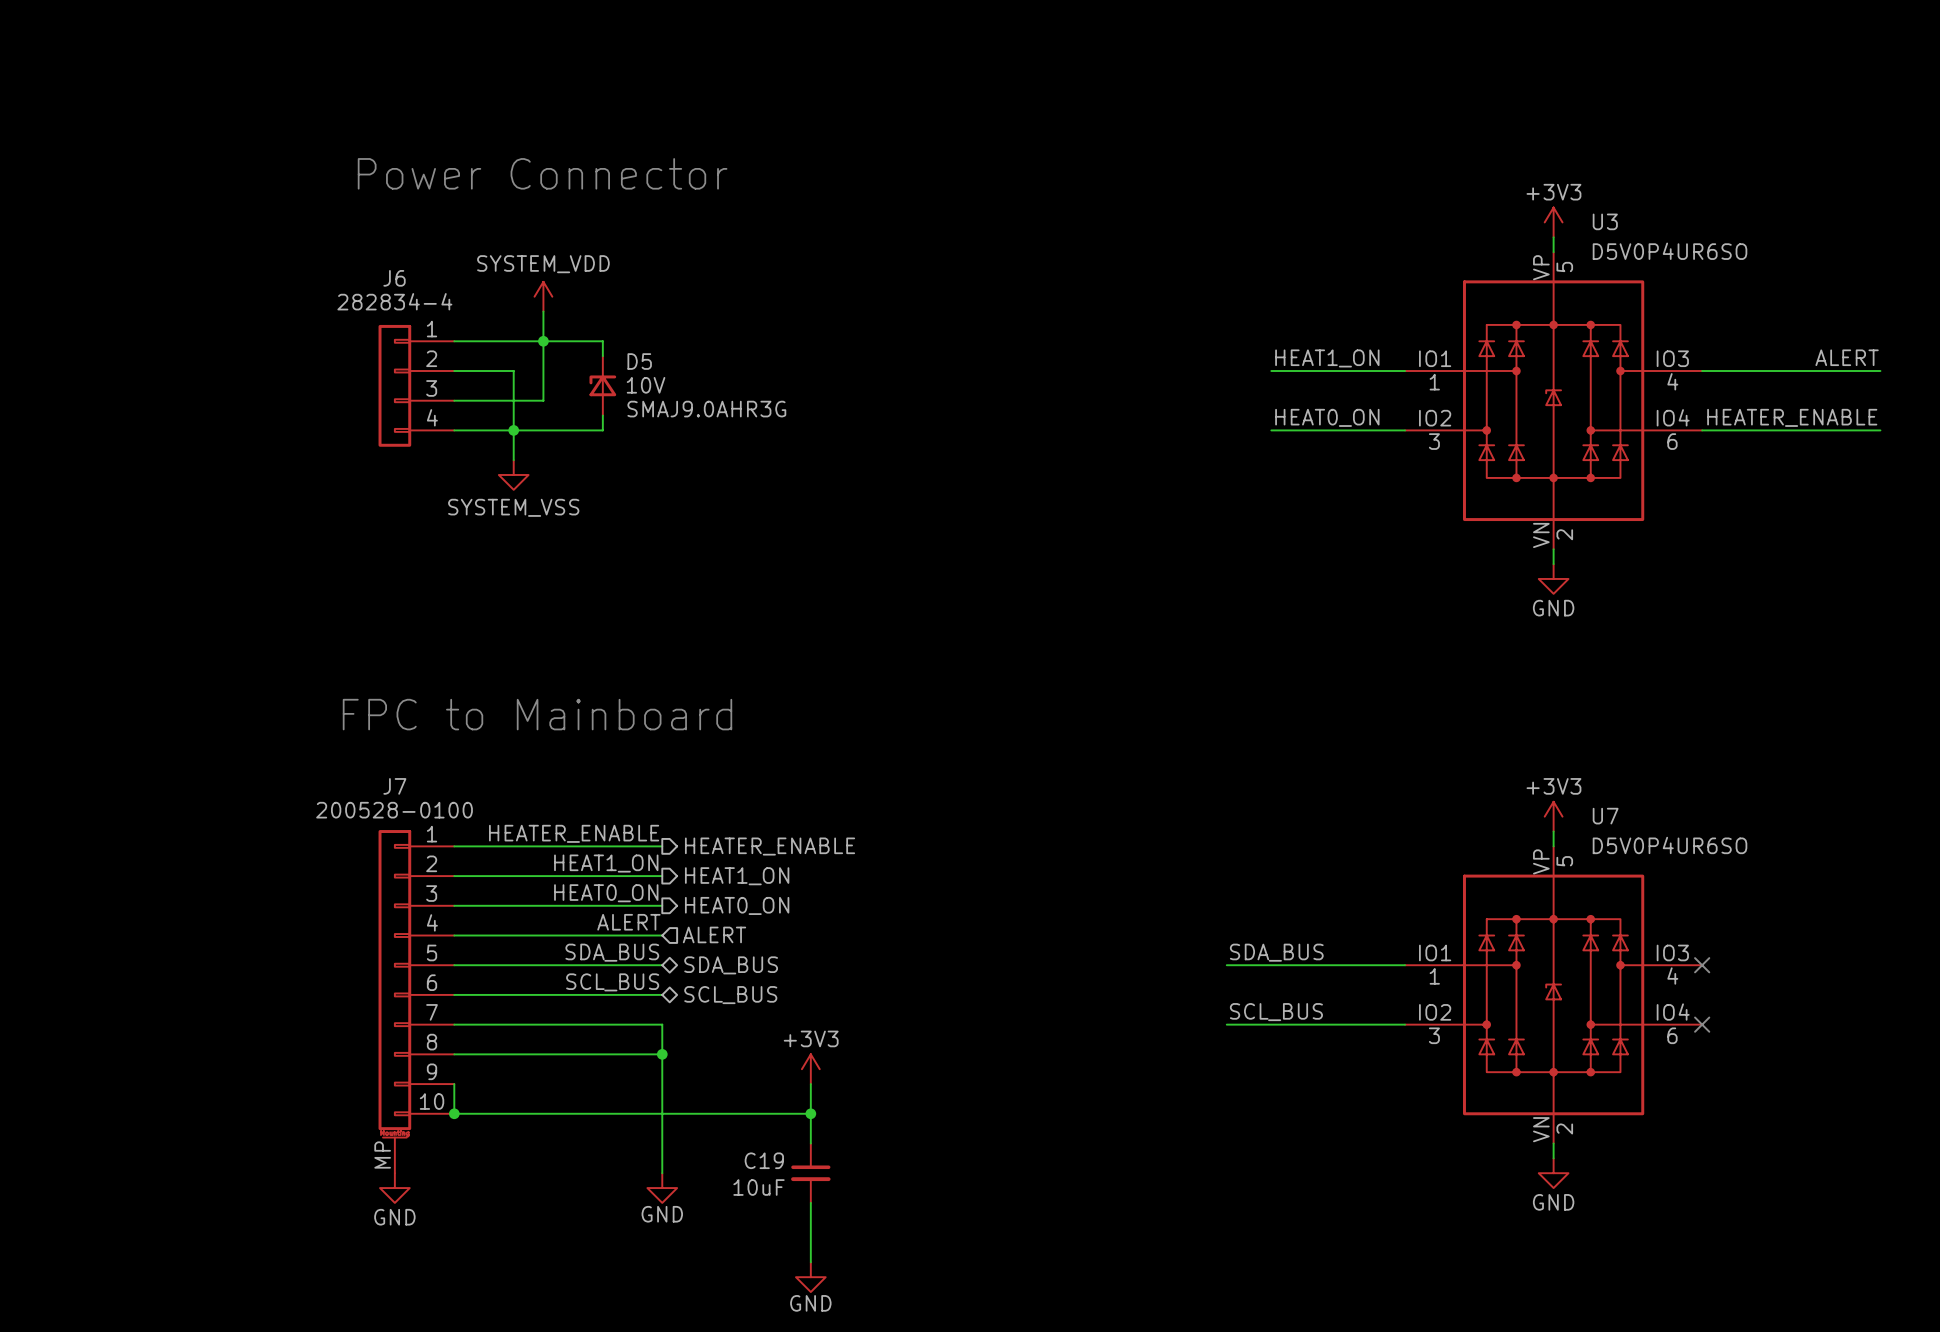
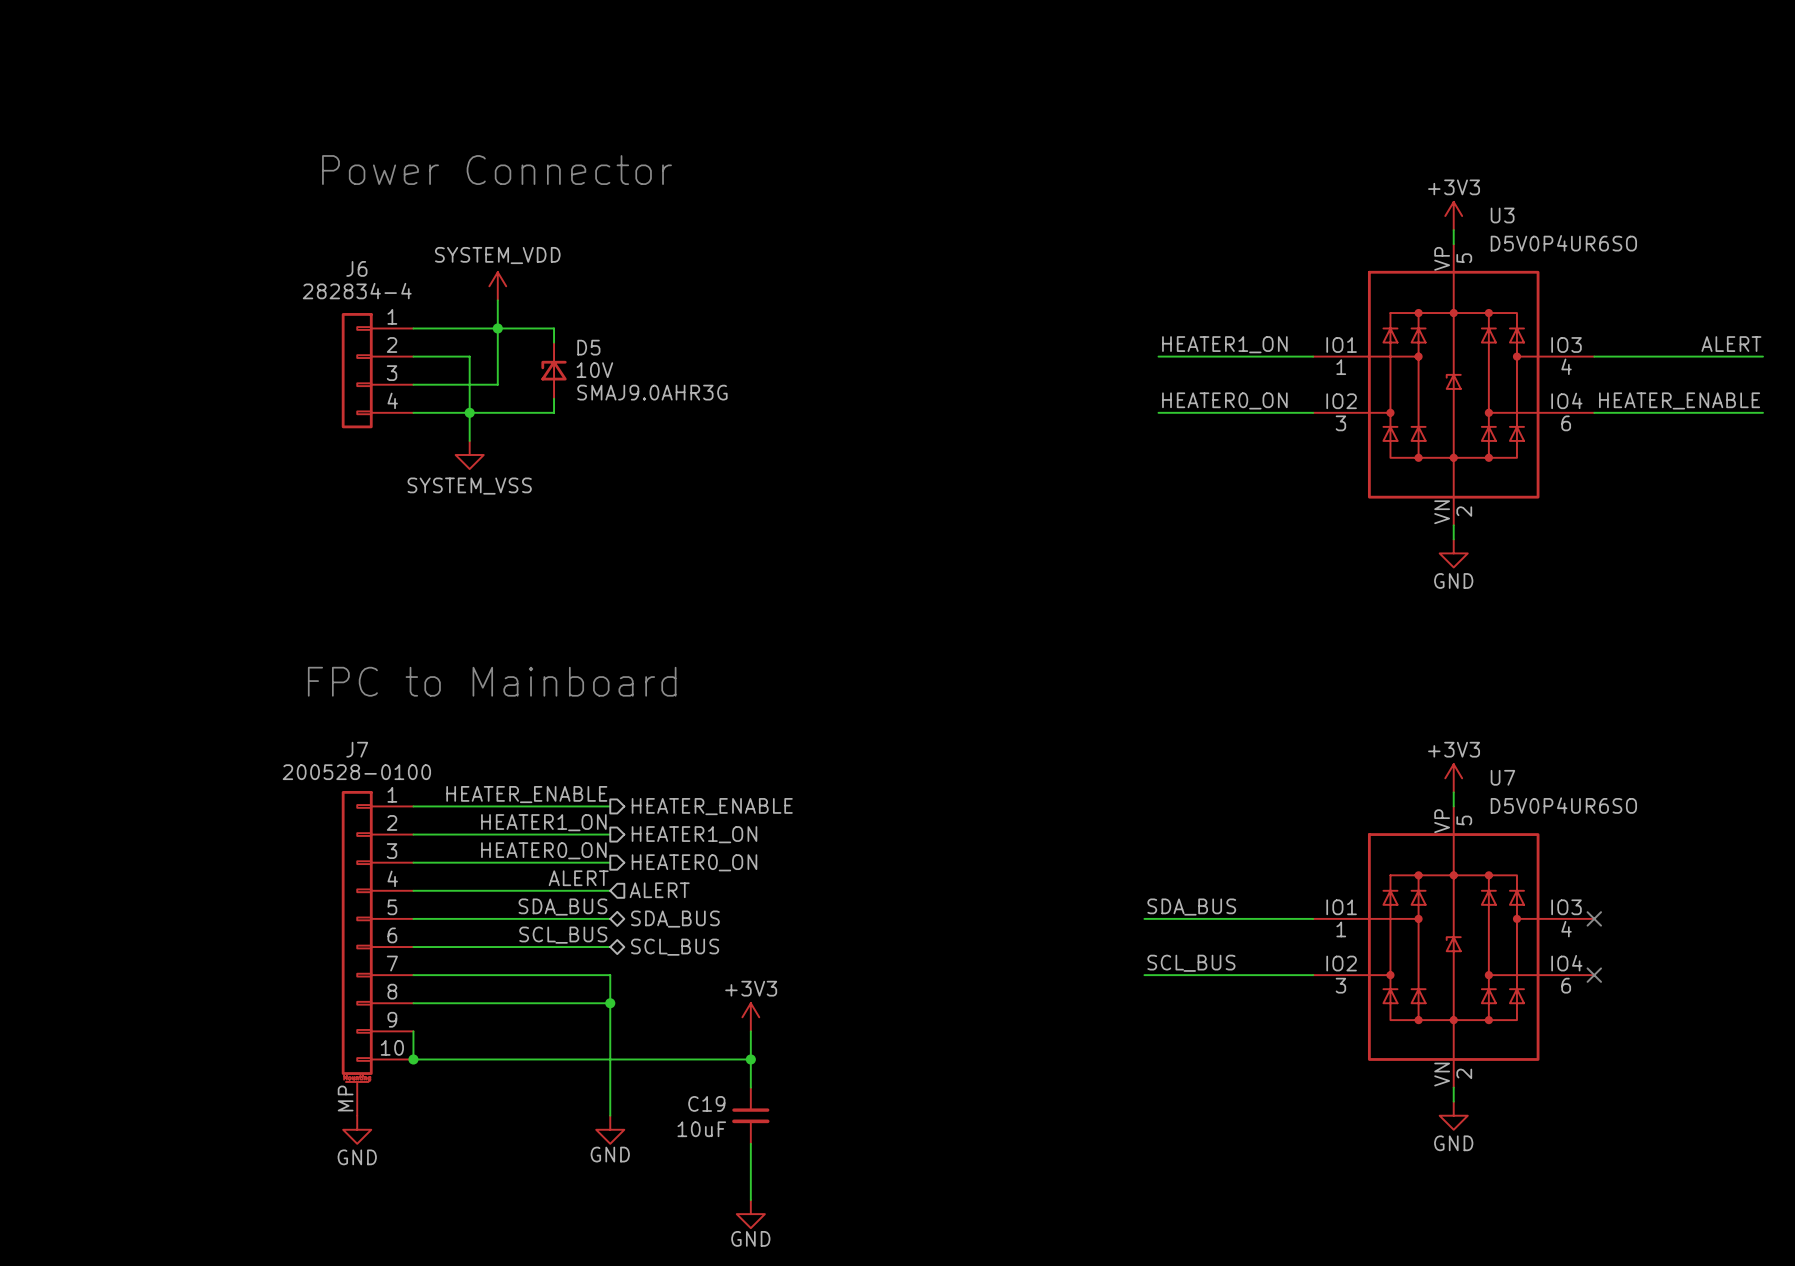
label: HEAT1_ON (1327, 358) -> HEATER1_ON (1224, 344)
wire: none -> (1158, 356) (1186, 356)
label: HEAT0_ON (1327, 417) -> HEATER0_ON (1224, 400)
wire: none -> (1158, 412) (1186, 412)
label: HEAT1_ON (606, 863) -> HEATER1_ON (543, 822)
hierarchical label: HEAT1_ON (737, 876) -> HEATER1_ON (694, 834)
label: HEAT0_ON (606, 893) -> HEATER0_ON (543, 850)
hierarchical label: HEAT0_ON (737, 905) -> HEATER0_ON (694, 862)

